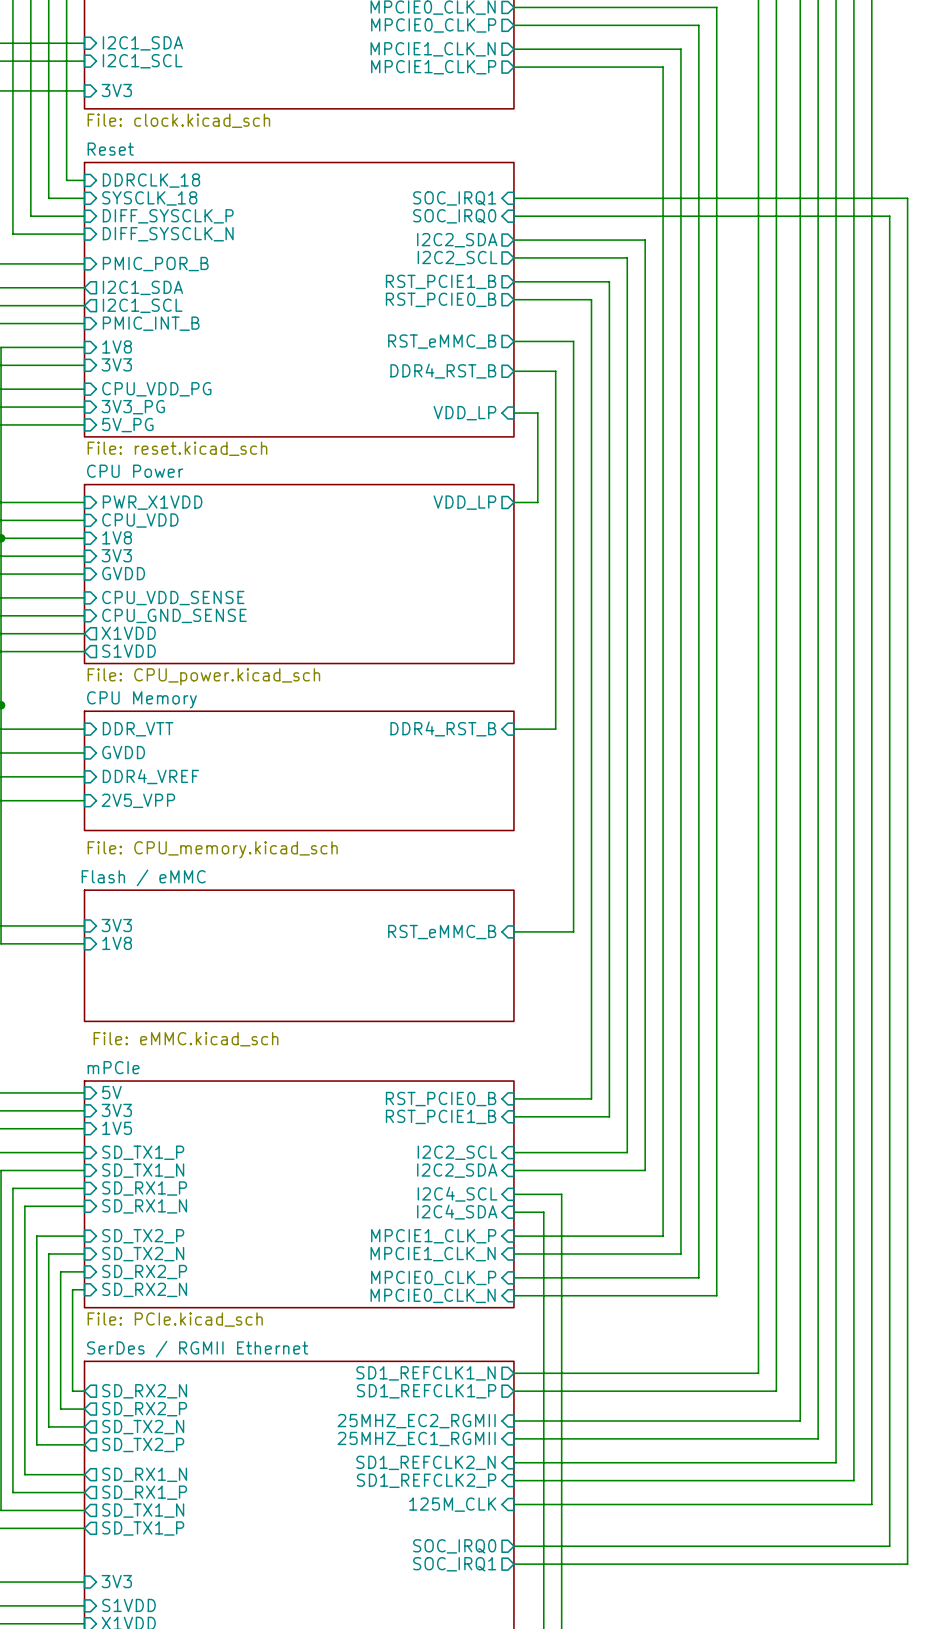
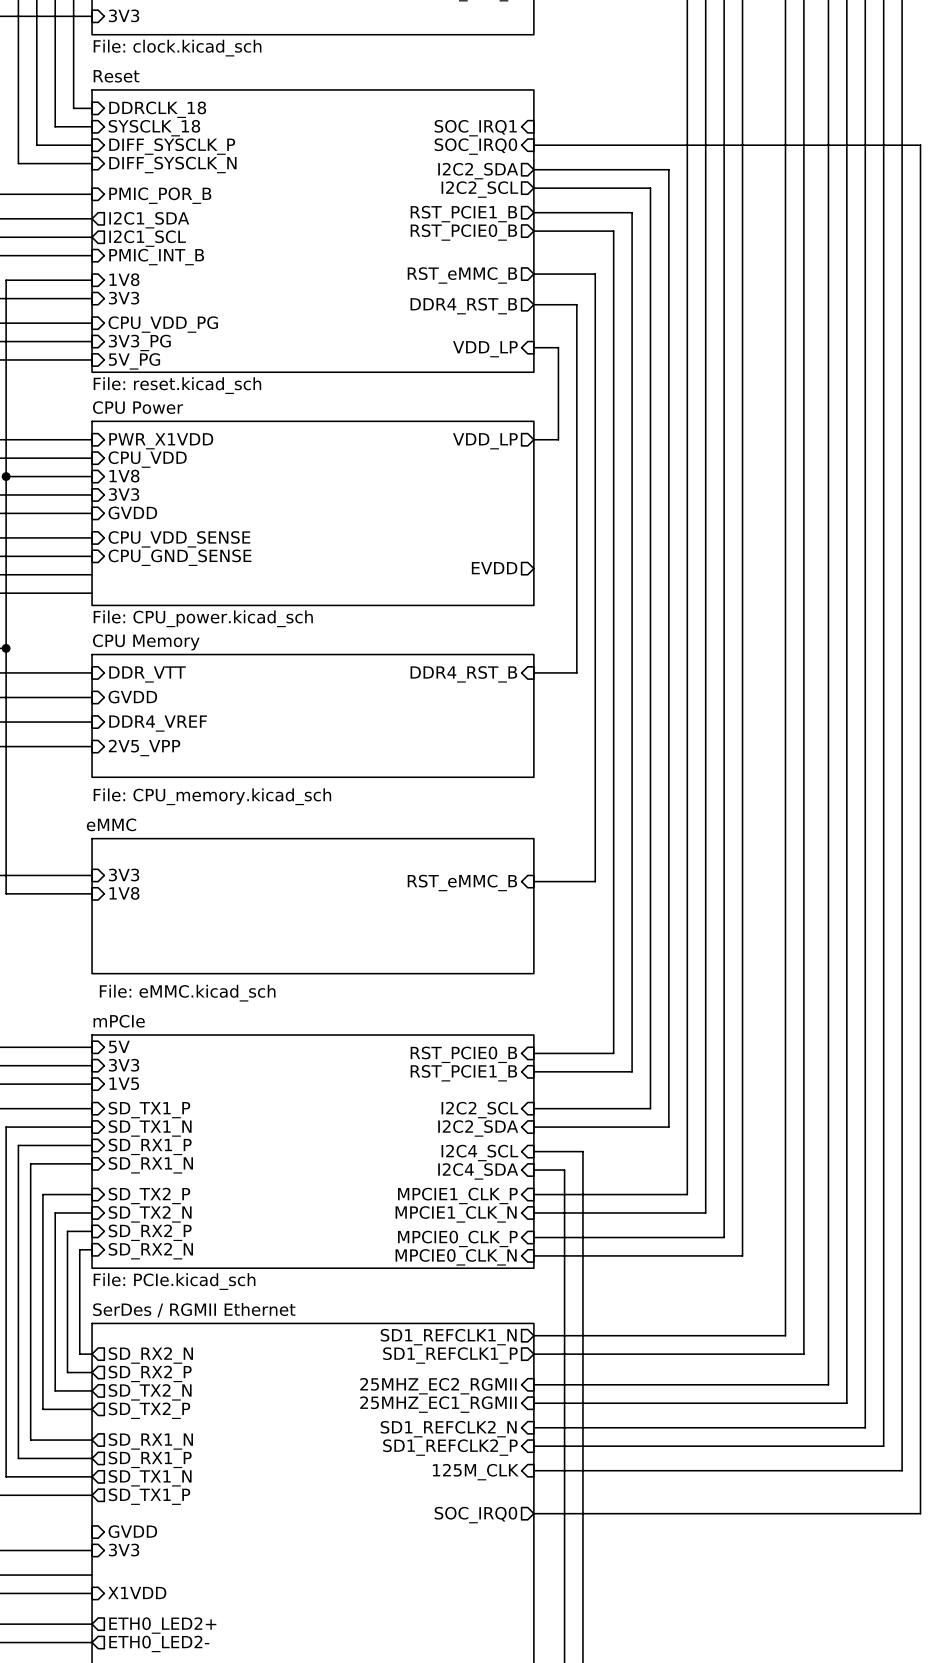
wire: (513, 198) (907, 198) (907, 1564) (513, 1564) -> none
sheet pin: none -> EVDD (494, 568)
sheet pin: X1VDD (128, 633) -> none
sheet pin: S1VDD (129, 651) -> none
sheet Flash / eMMC name: Flash / eMMC (143, 877) -> eMMC (111, 824)
sheet pin: none -> GVDD (132, 1531)
sheet pin: SOC_IRQ1 (454, 1564) -> none
sheet pin: S1VDD (129, 1605) -> none

